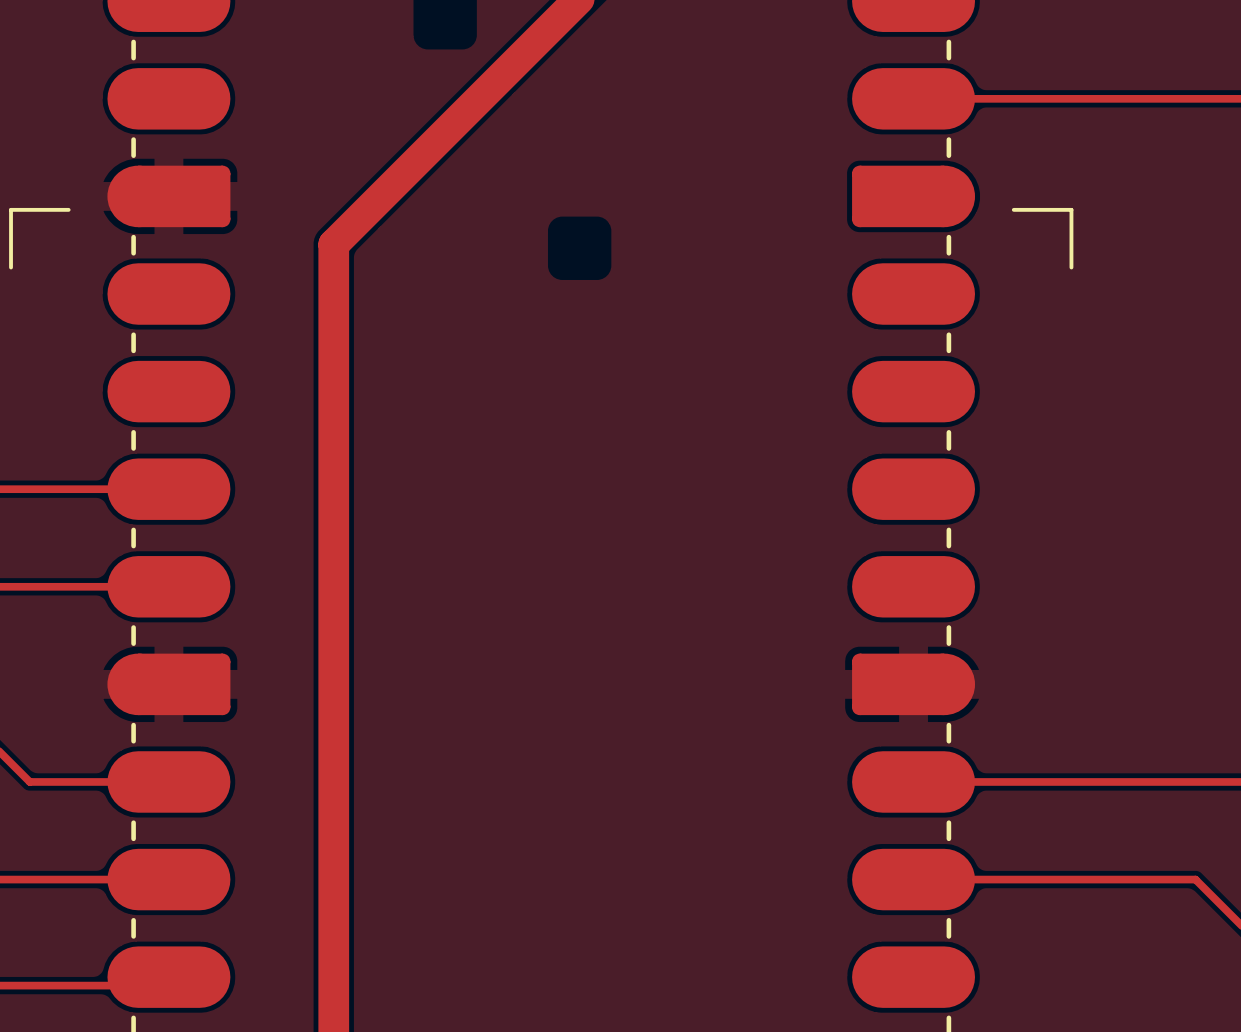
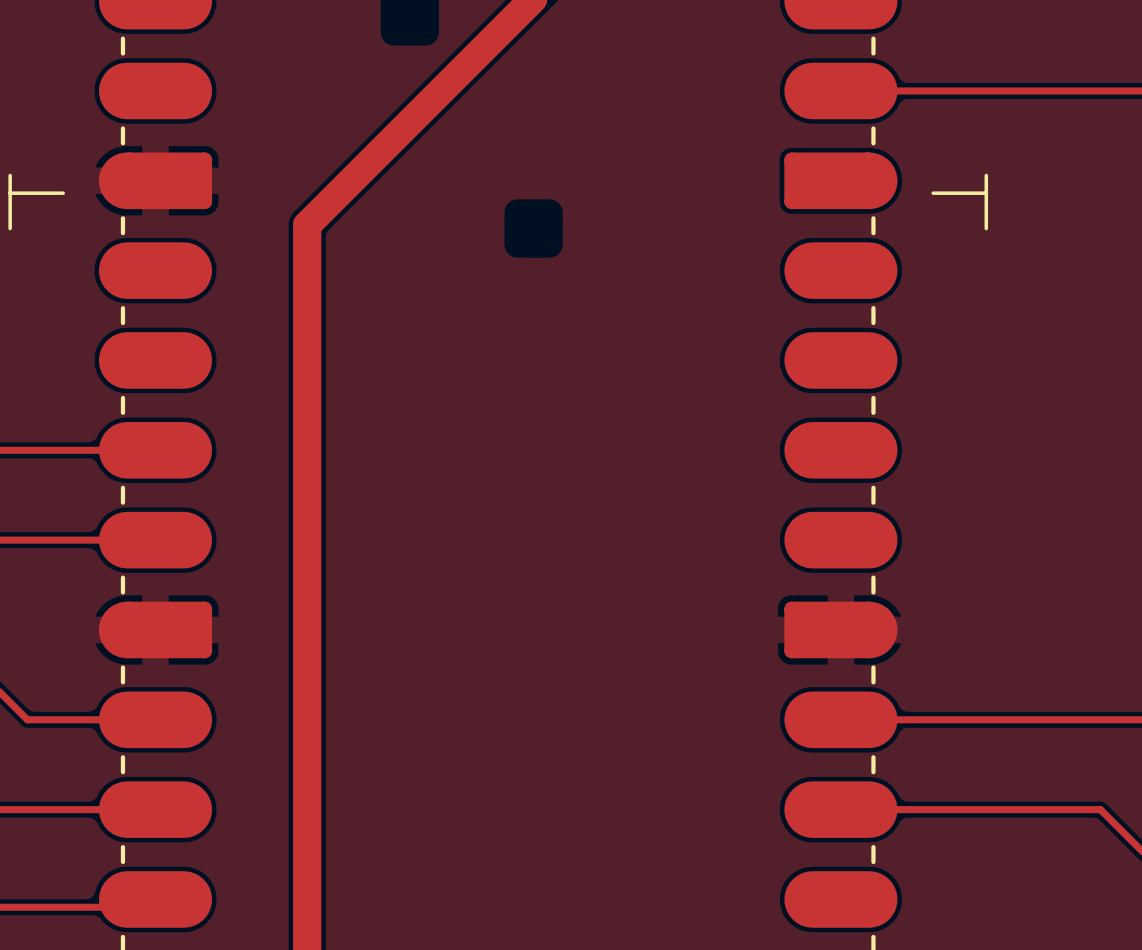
line: (11, 248) (11, 267) -> (10, 175) (10, 193)
line: (1071, 248) (1071, 267) -> (986, 175) (986, 193)

